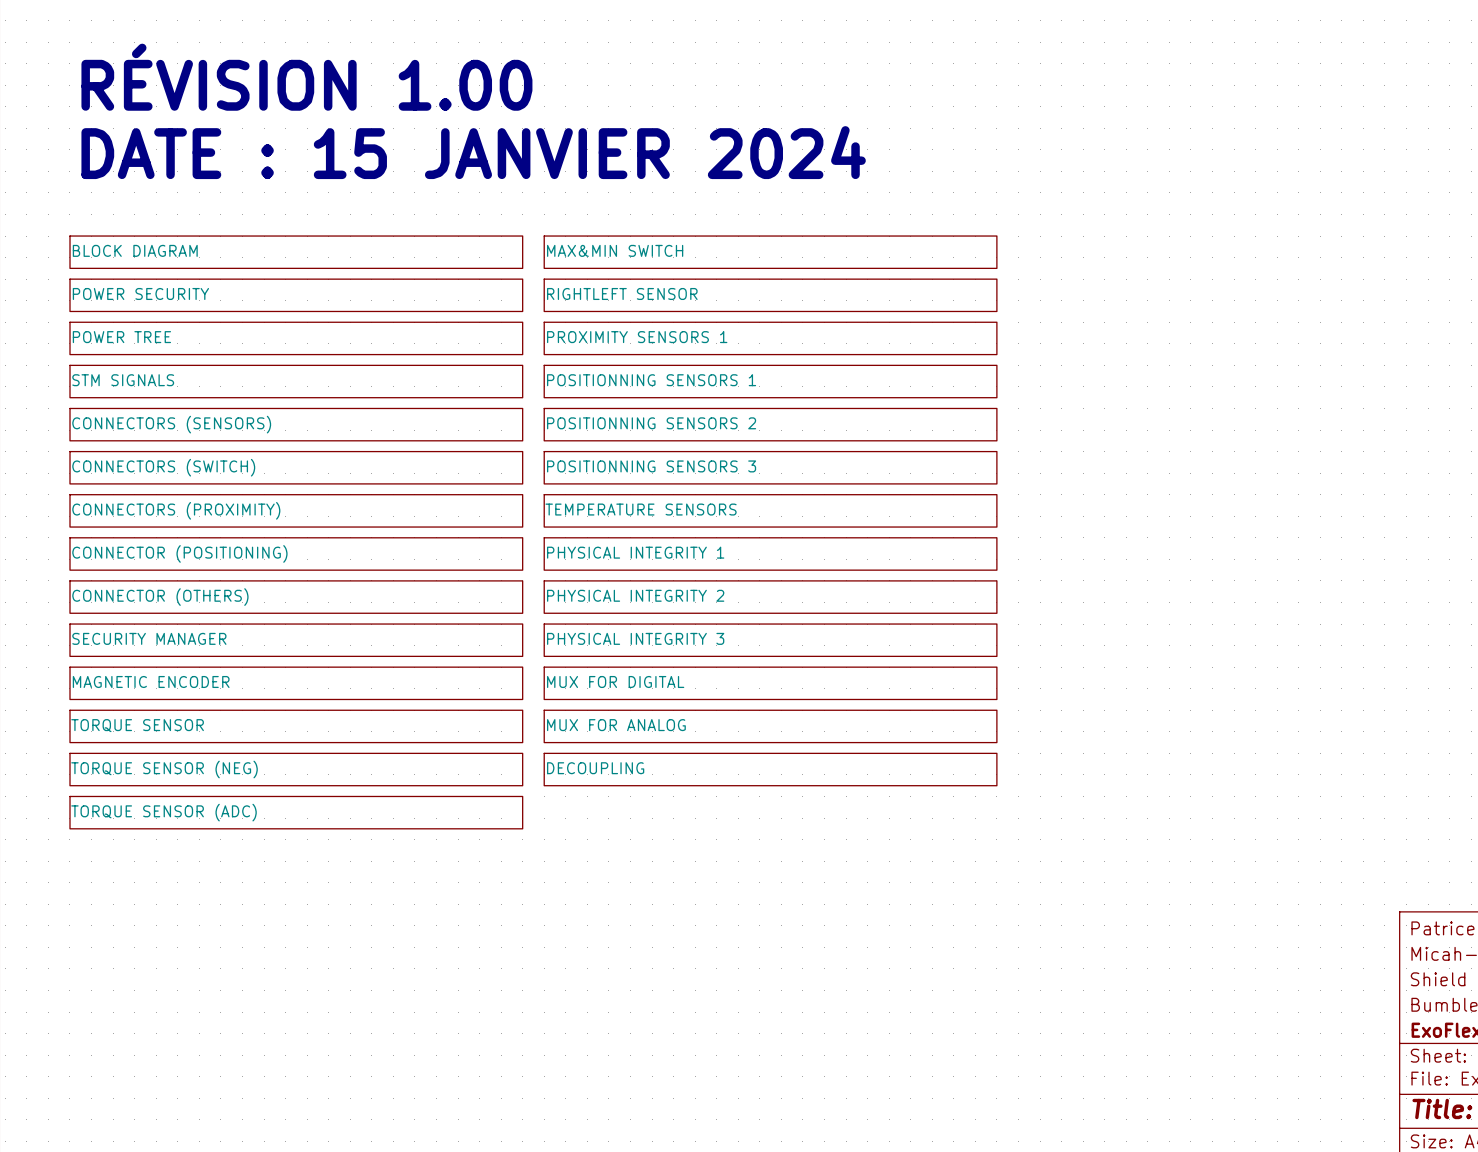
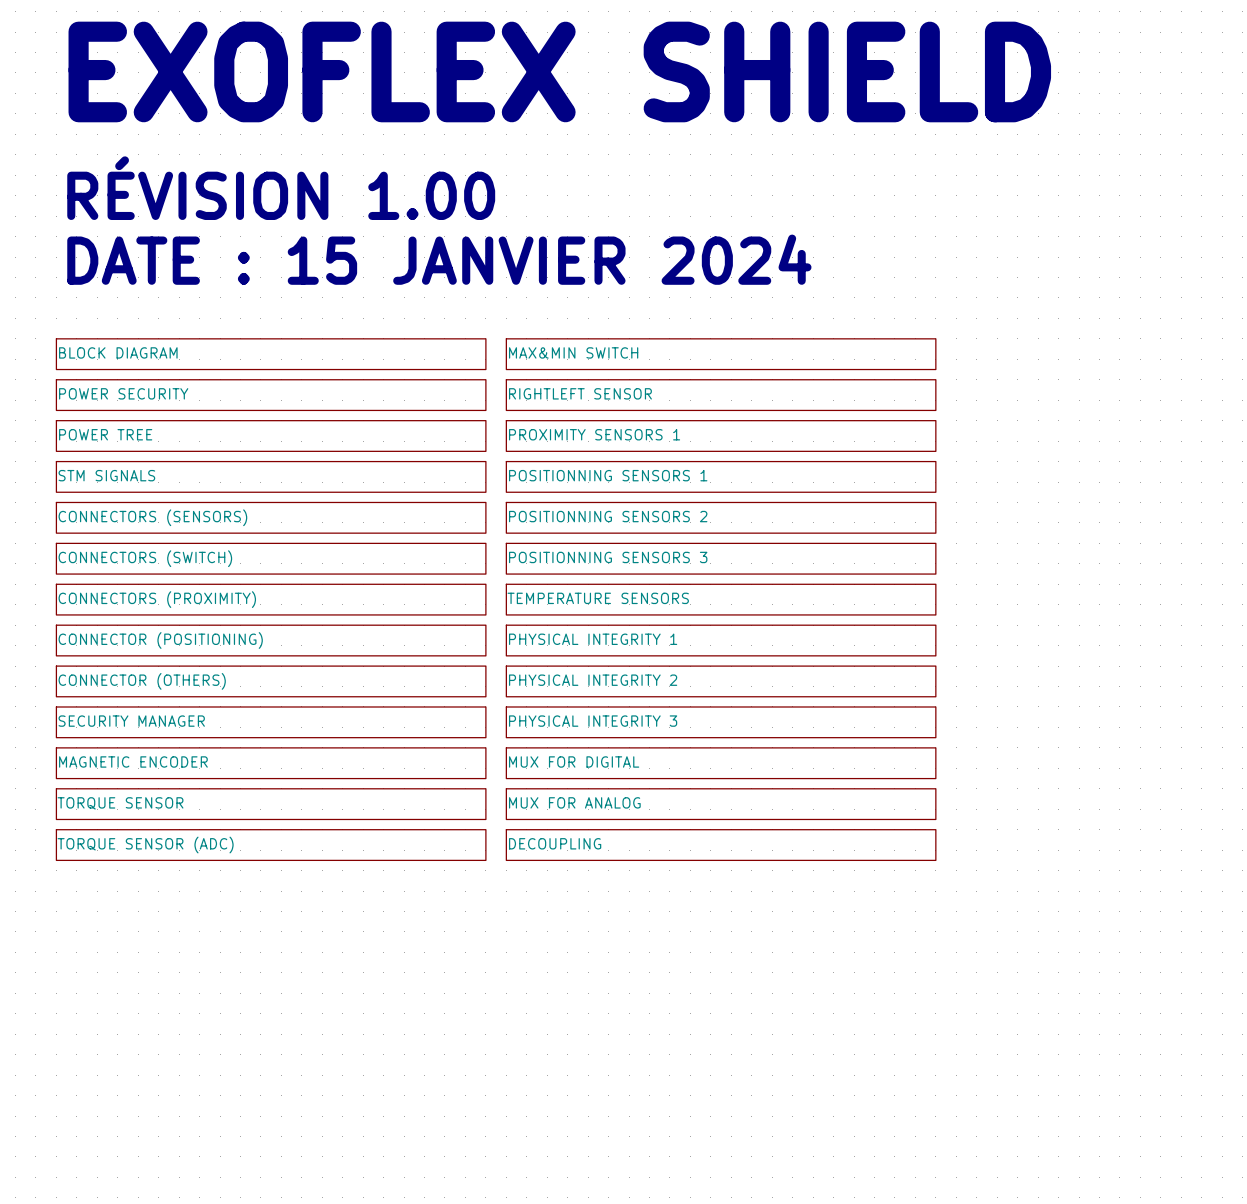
sheet TORQUE SENSOR (NEG) name: TORQUE SENSOR (NEG) (164, 769) -> TORQUE SENSOR (ADC) (145, 845)
sheet TORQUE SENSOR (ADC): (296, 812) -> none

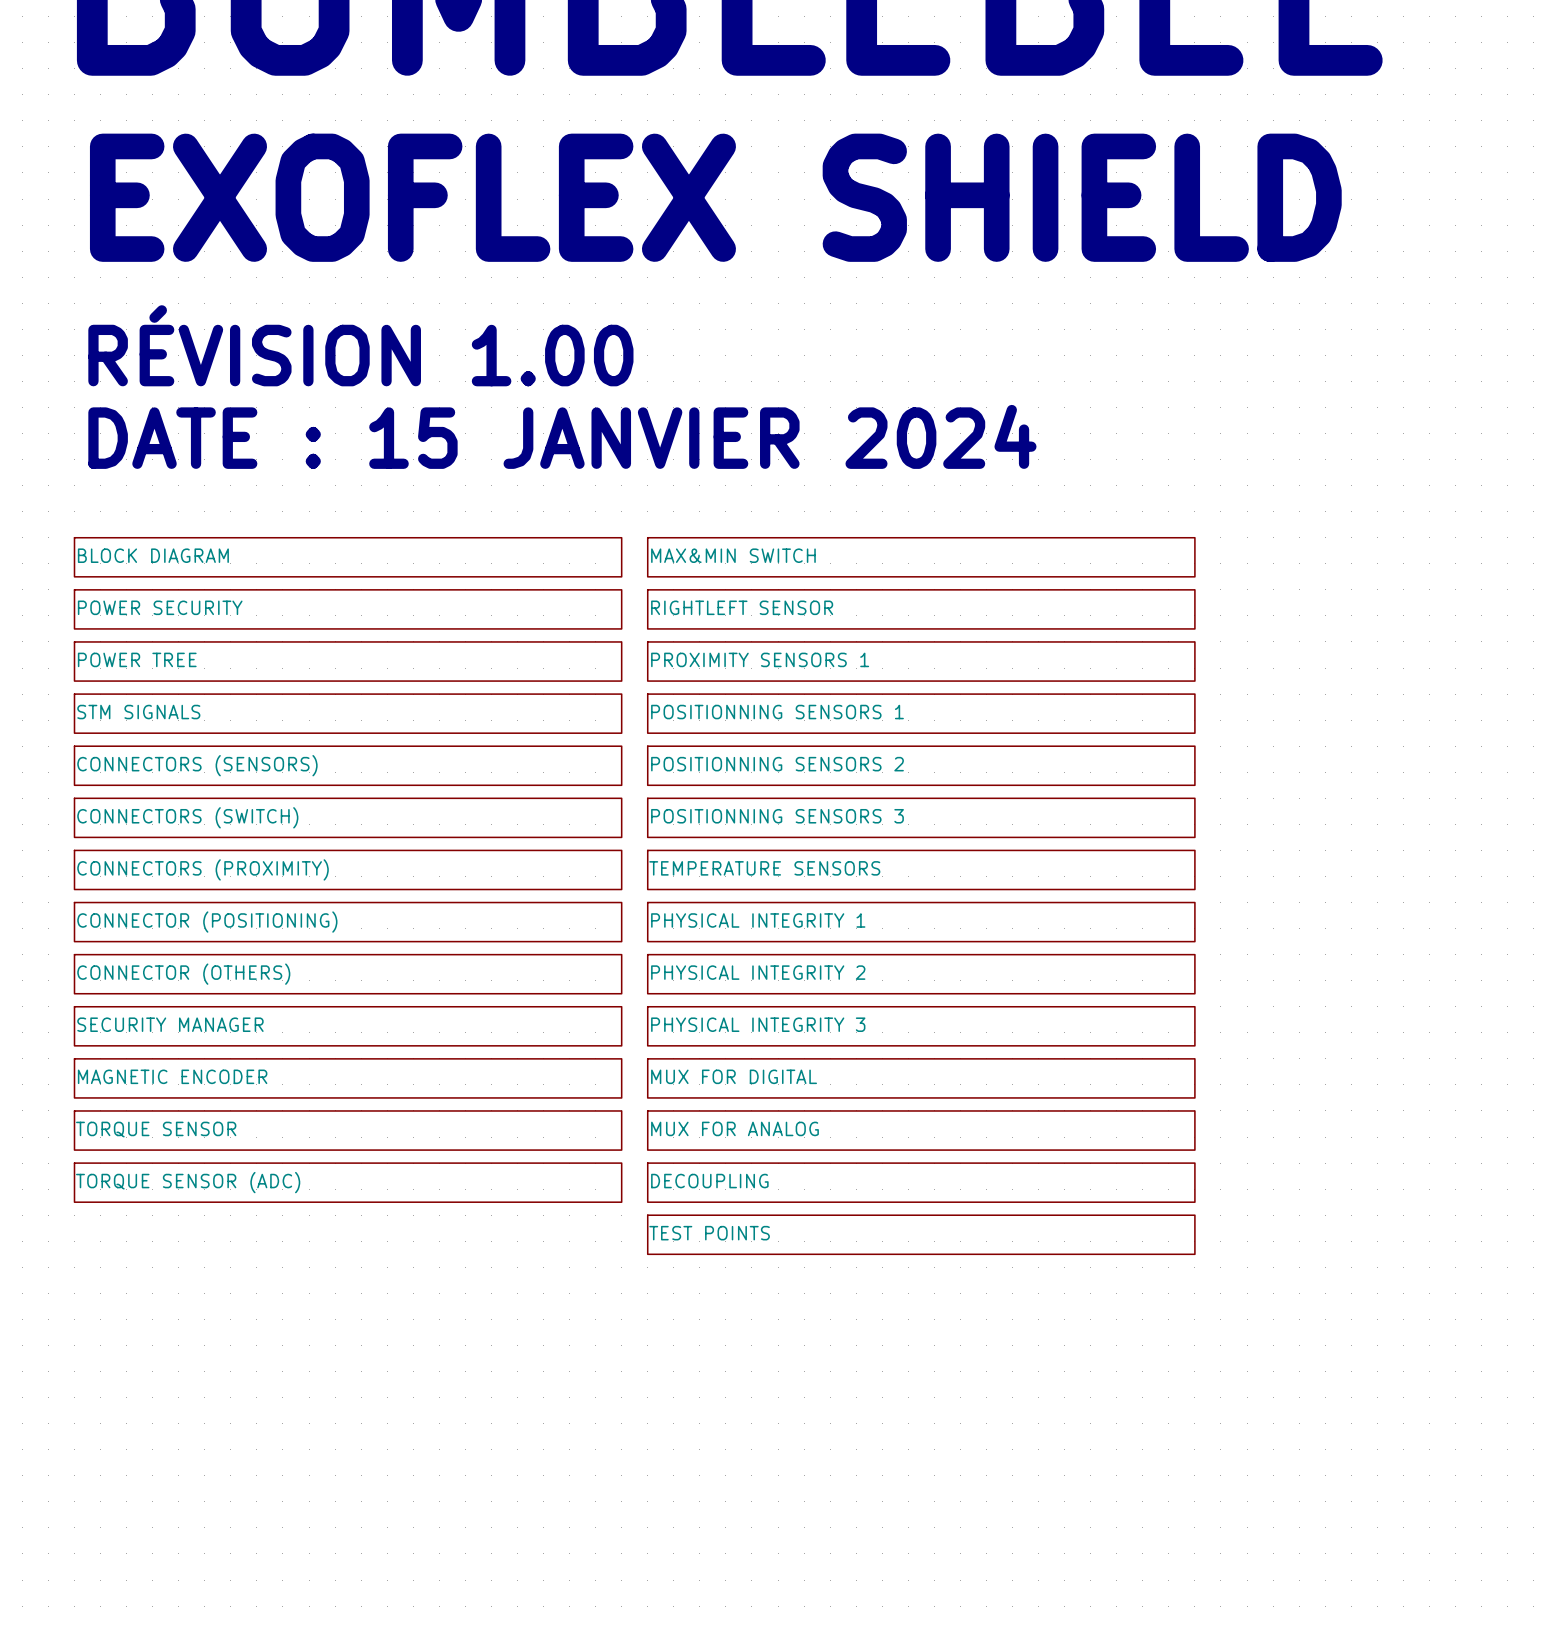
sheet TEST POINTS: none -> (921, 1234)

